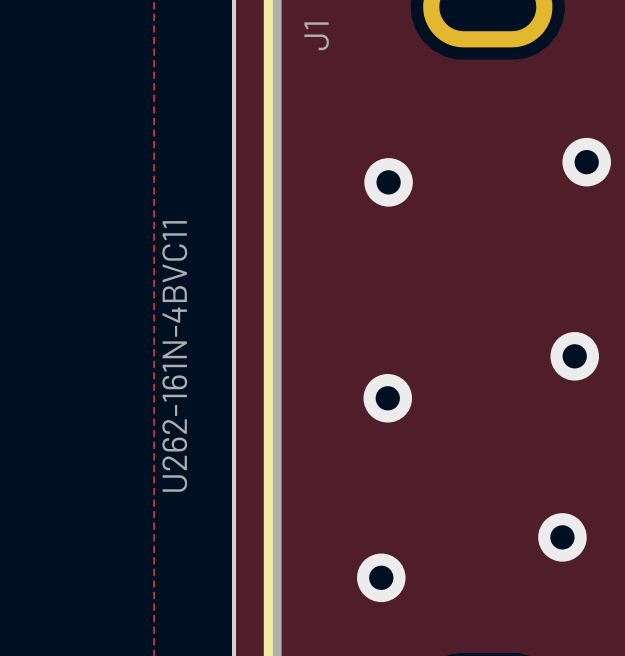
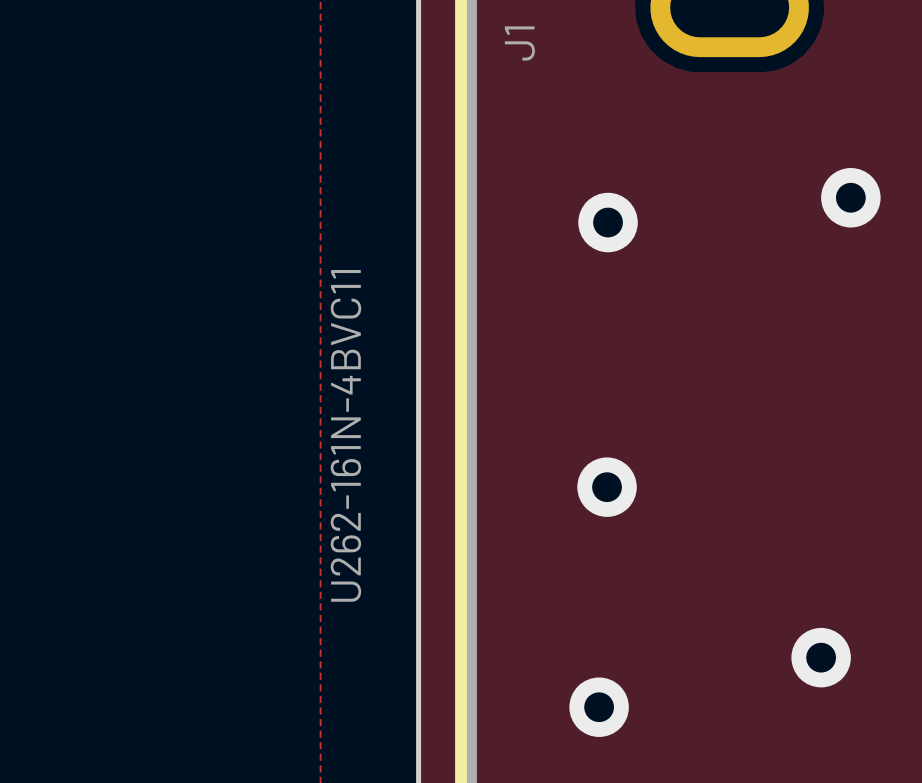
via: (574, 356) -> none

